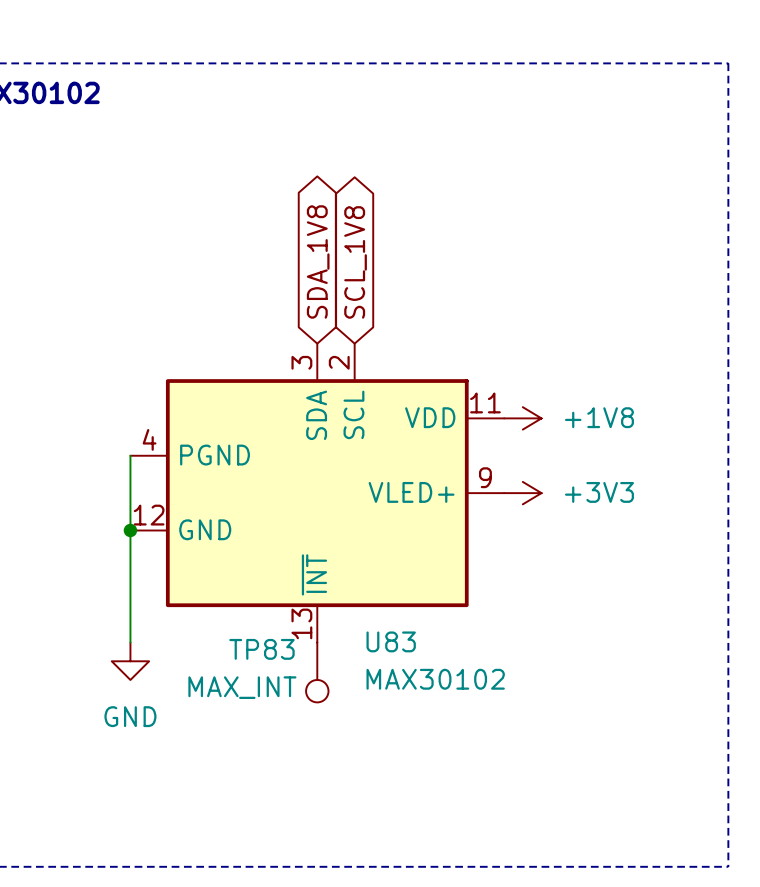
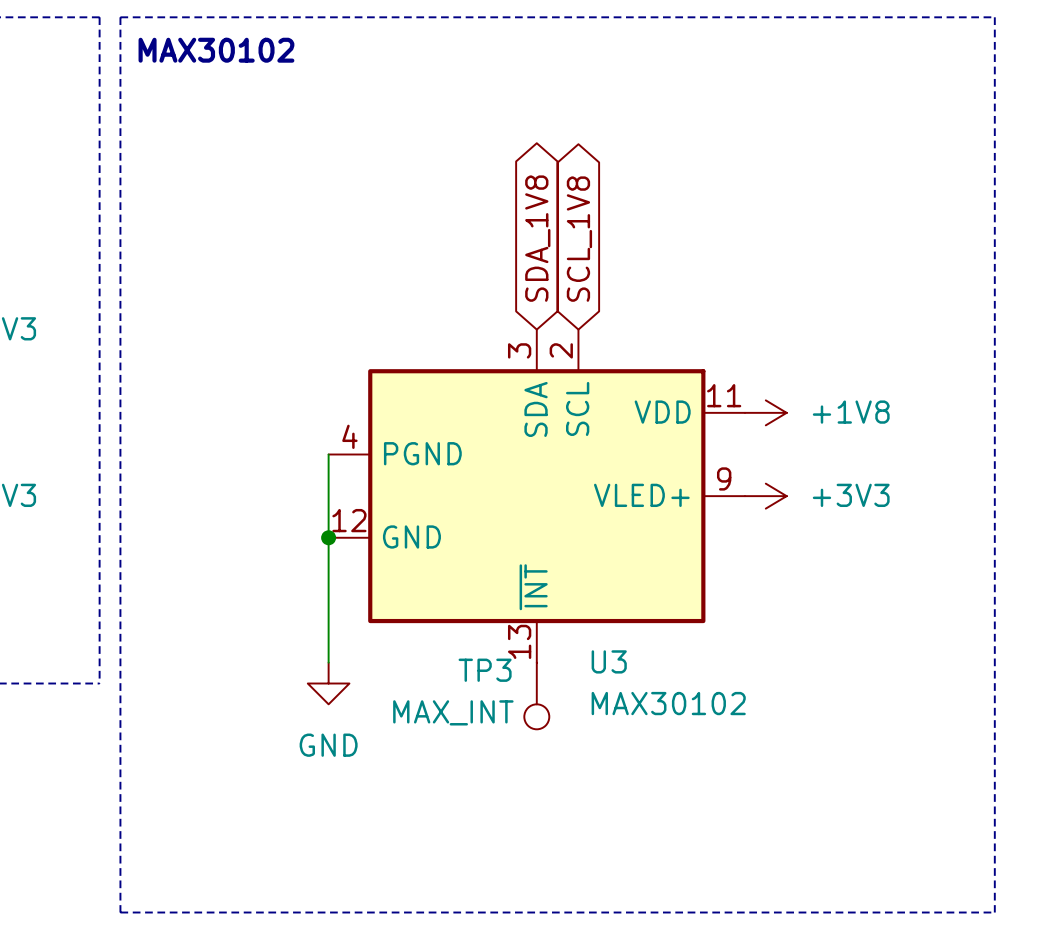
U83 name: U83 (391, 641) -> U3 (609, 661)
TP83 name: TP83 (261, 649) -> TP3 (485, 670)

